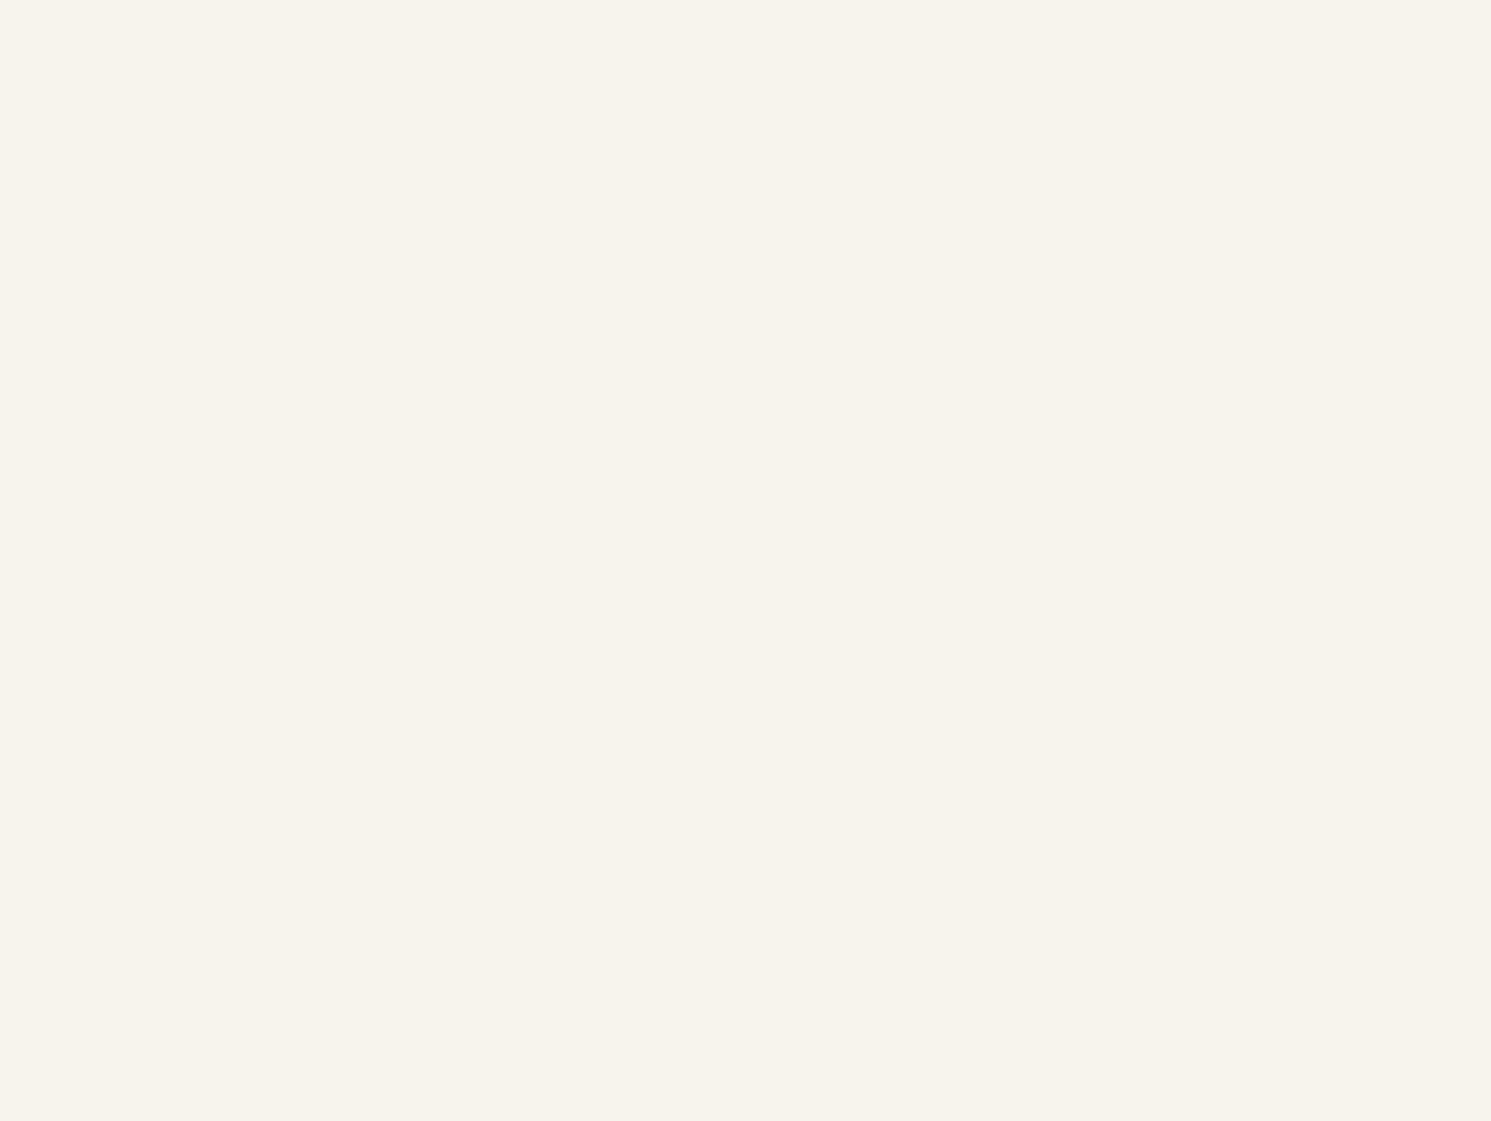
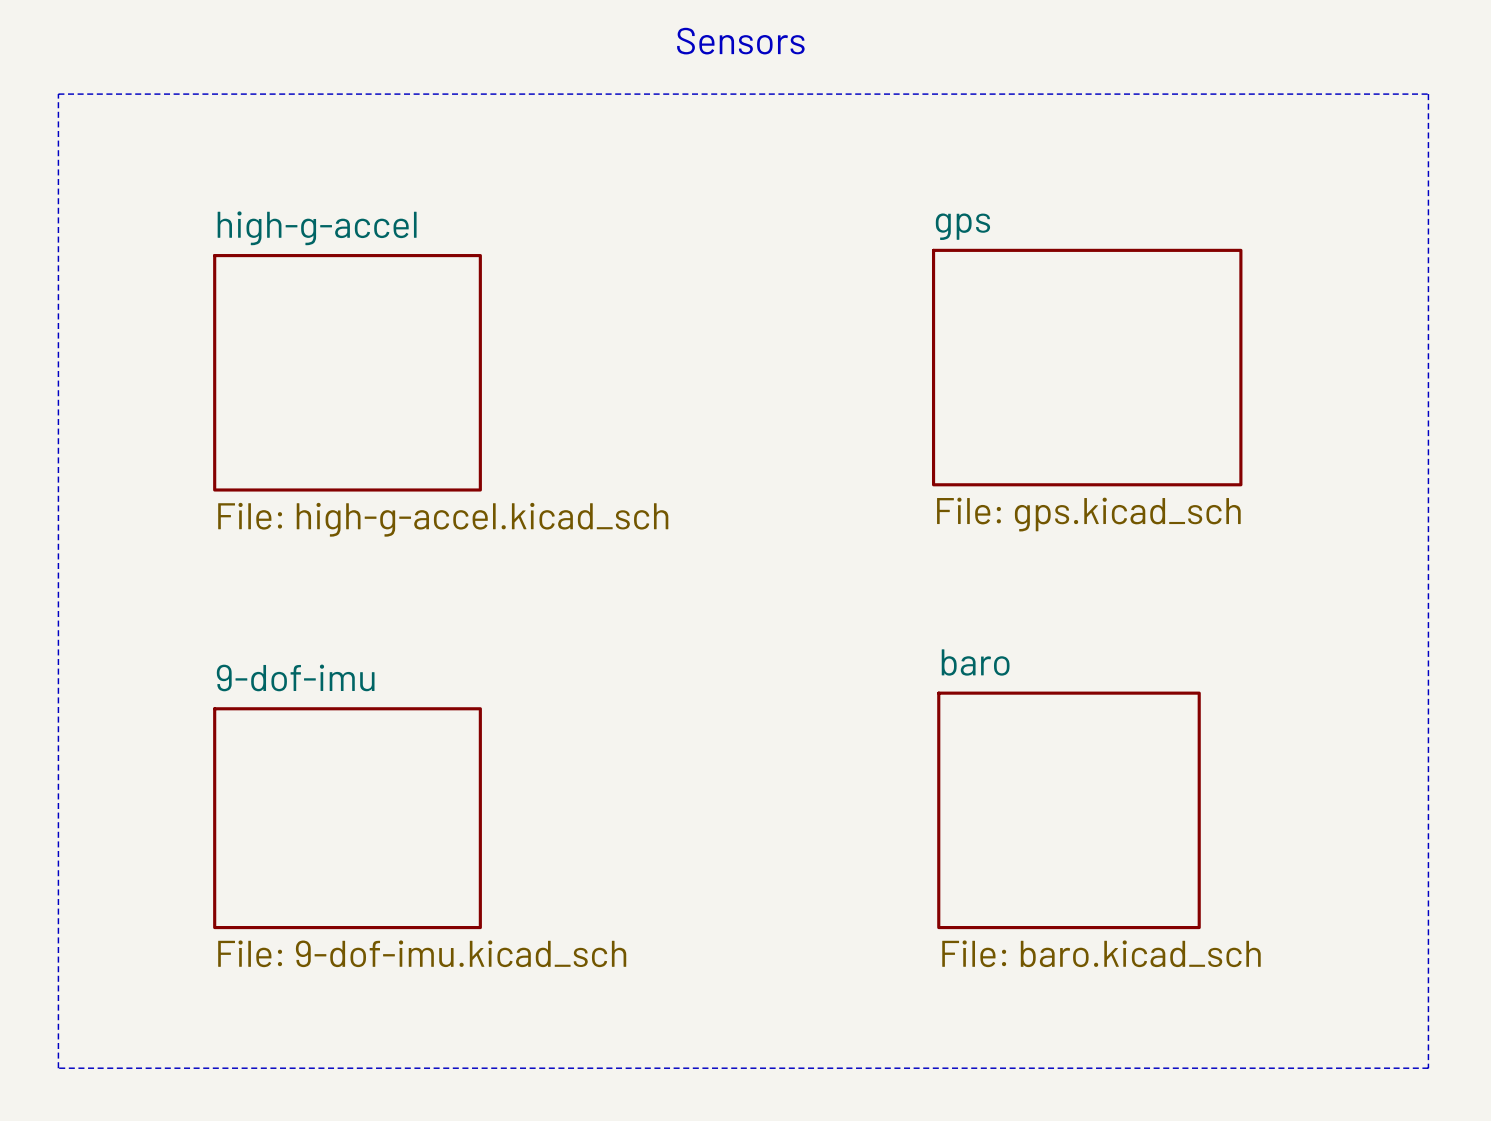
text: none -> Sensors (740, 41)
line: none -> (58, 94) (1428, 94) (1428, 1068) (58, 1068) (58, 94)
sheet gps: none -> File: gps.kicad_sch (1087, 367)
sheet high-g-accel: none -> File: high-g-accel.kicad_sch (347, 372)
sheet baro: none -> File: baro.kicad_sch (1068, 810)
sheet 9-dof-imu: none -> File: 9-dof-imu.kicad_sch (347, 818)

